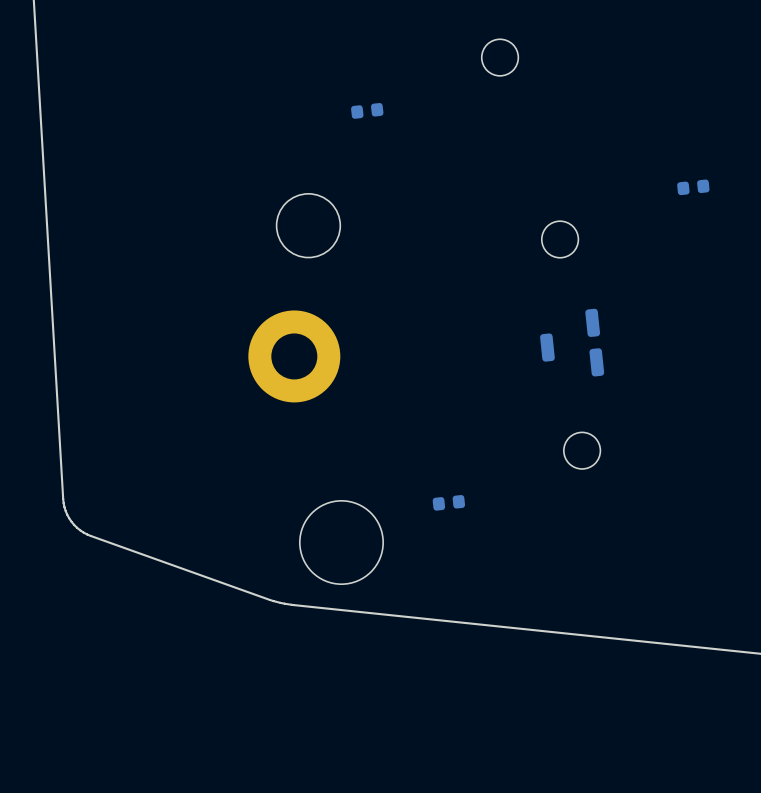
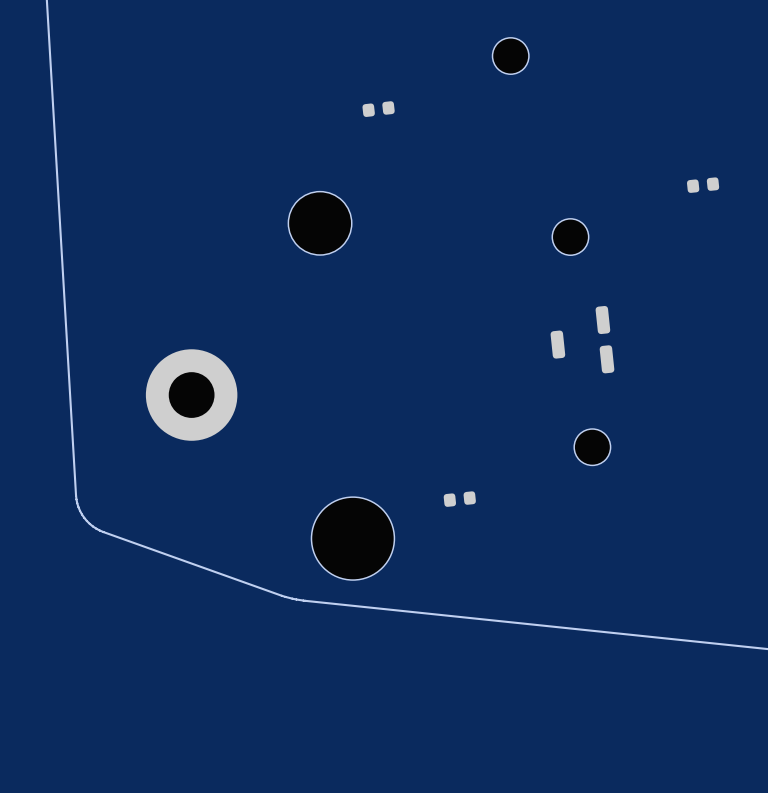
part position: (294, 356) -> (191, 395)

